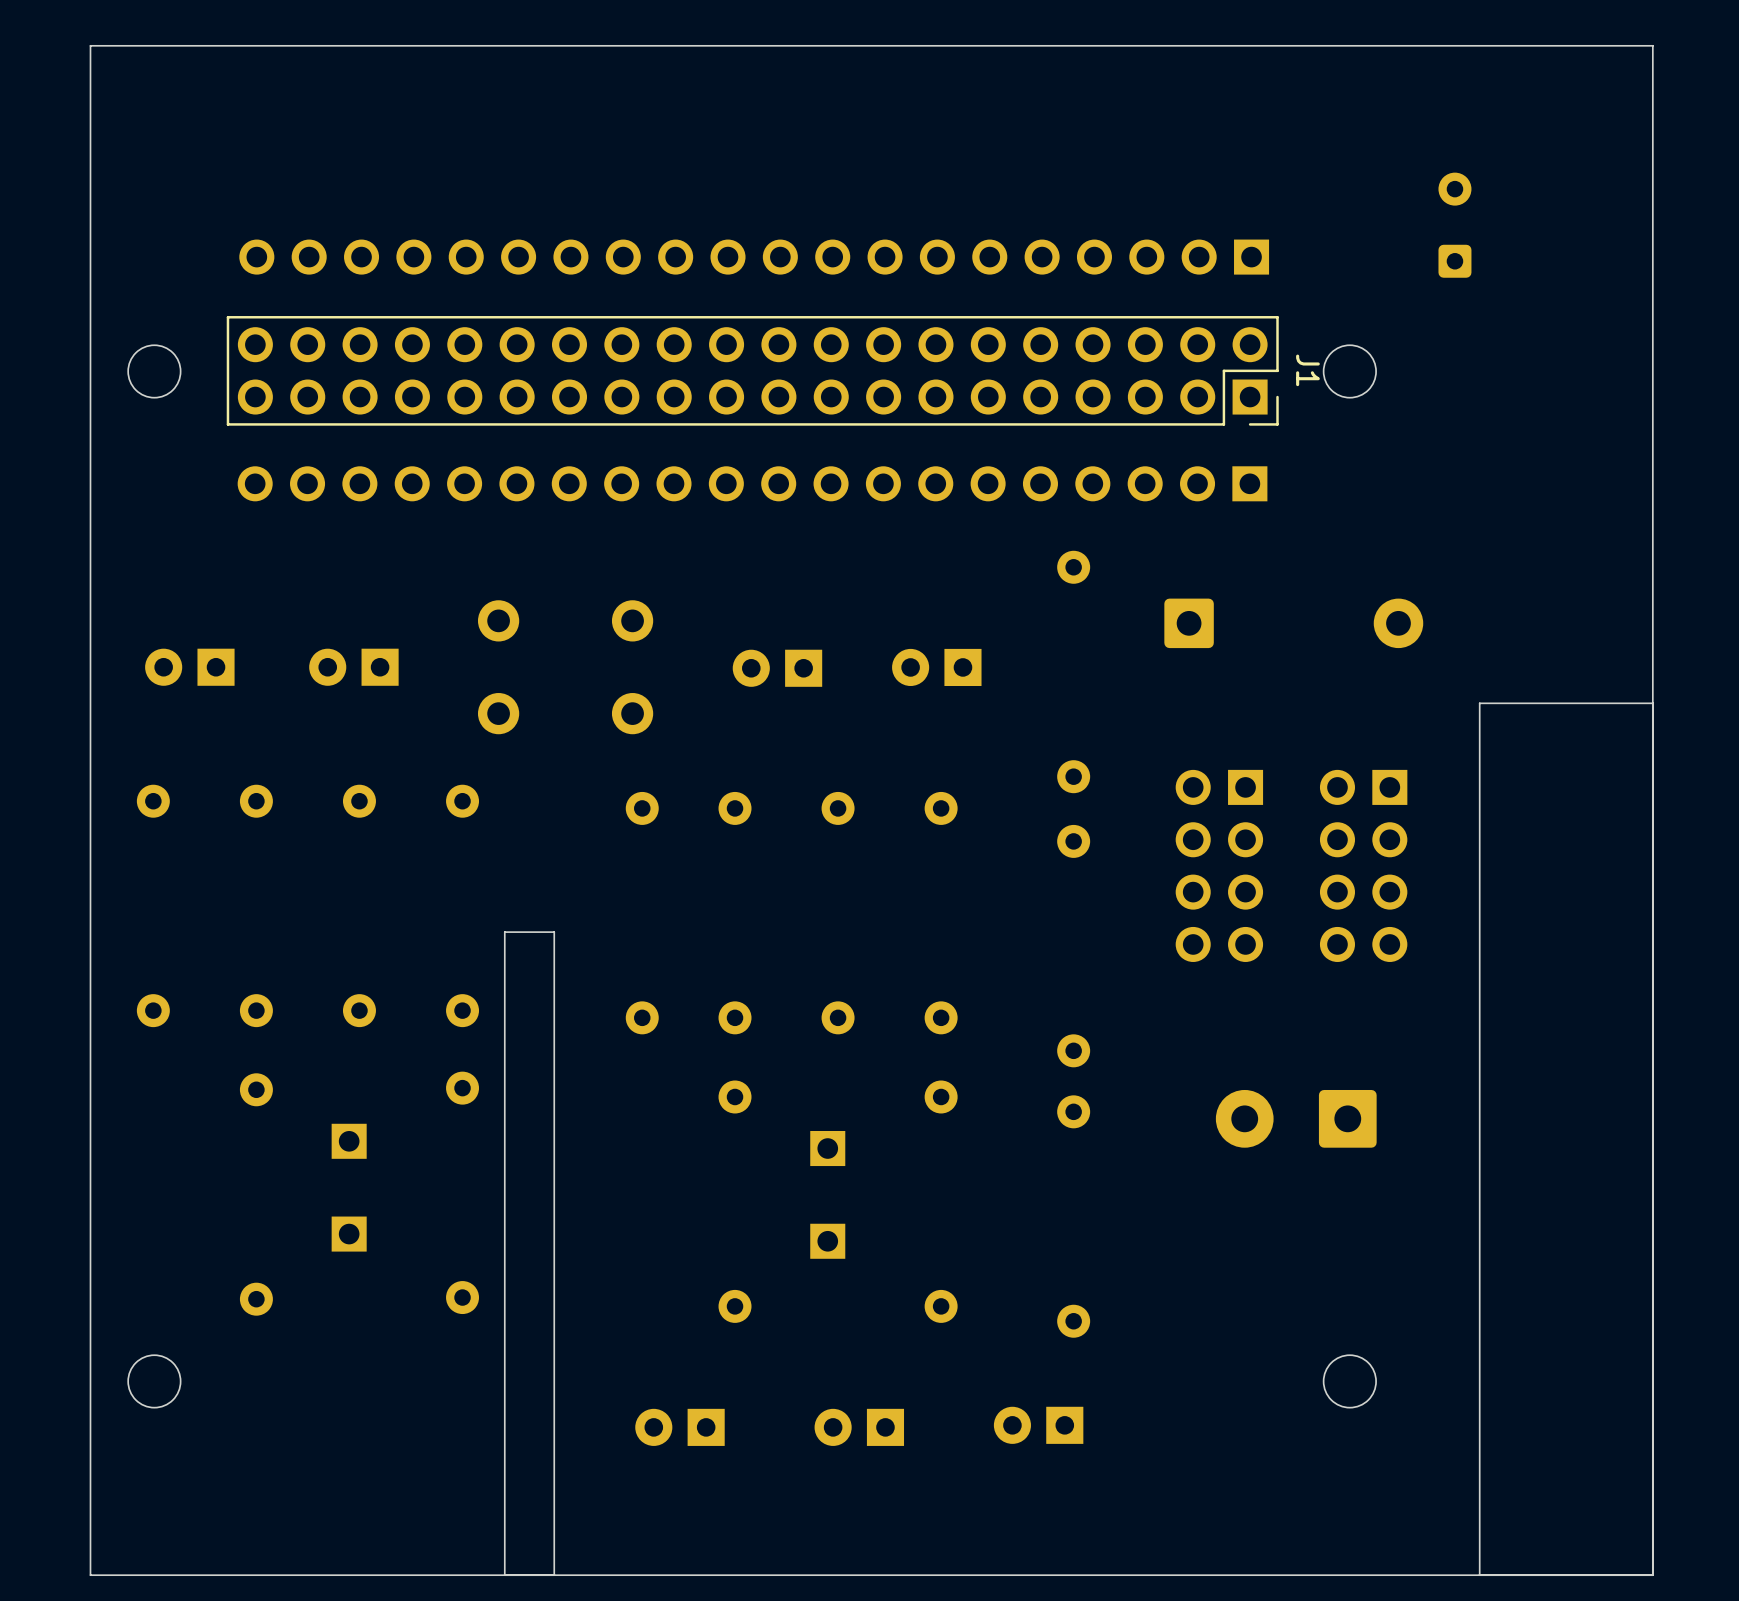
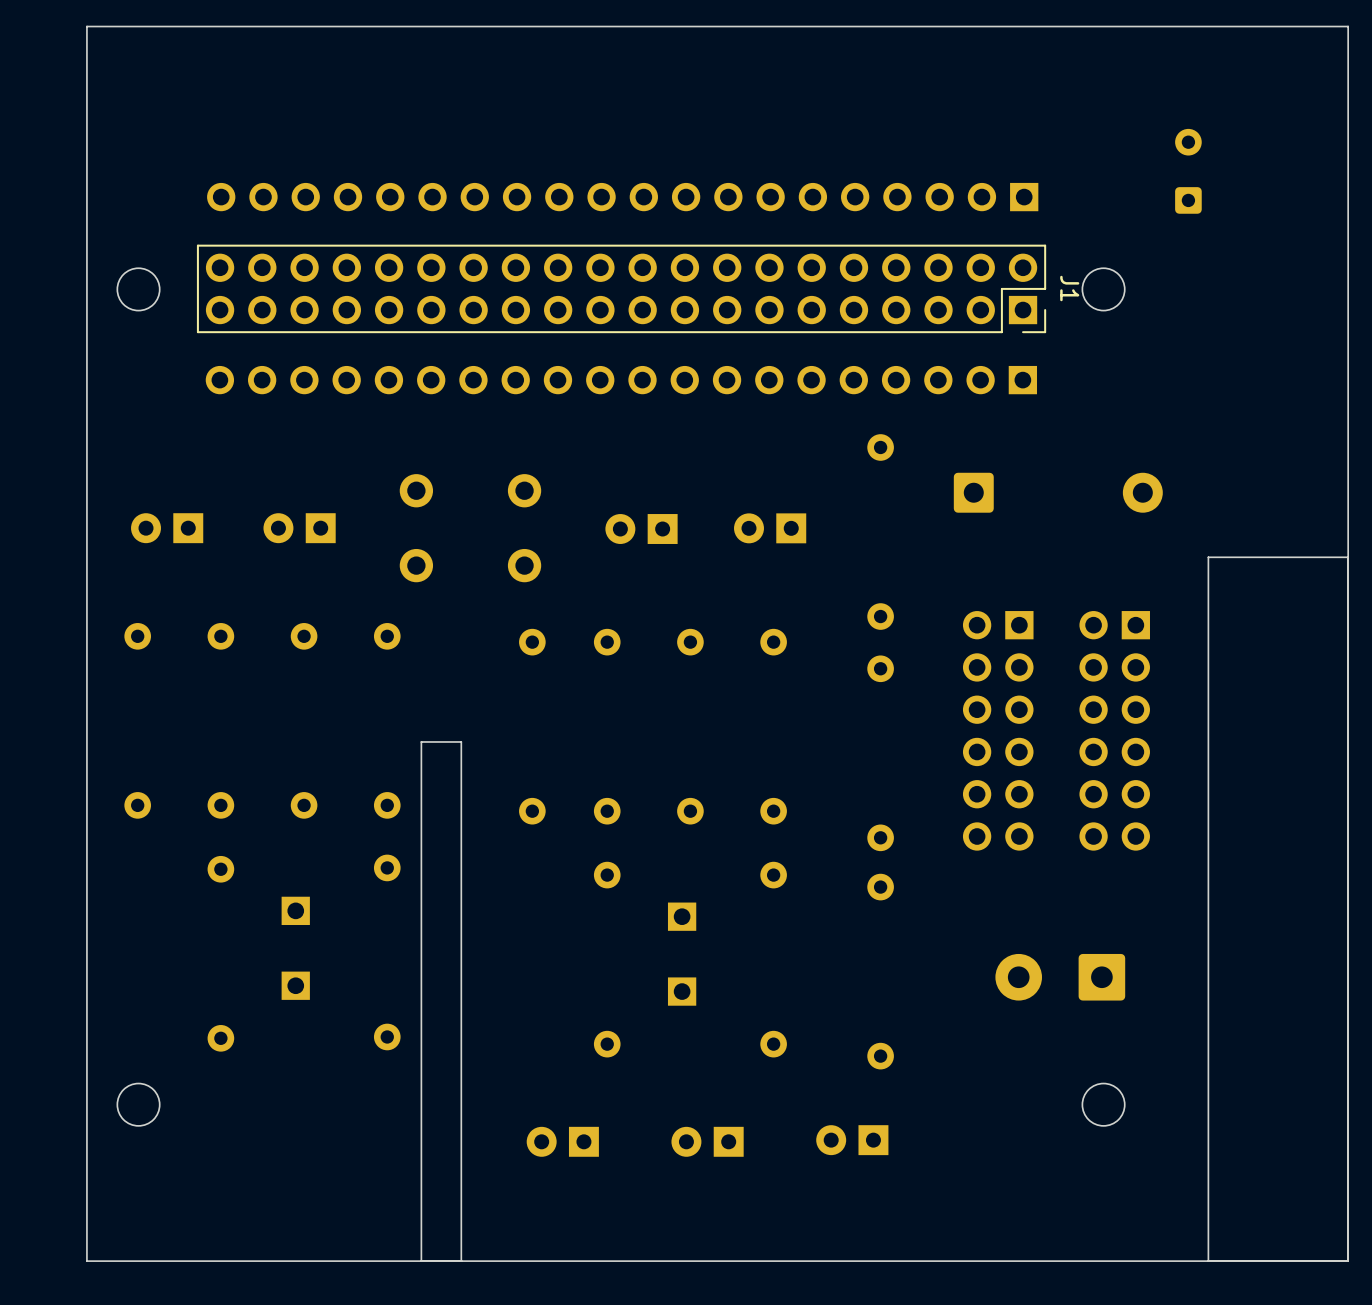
part: none -> (998, 730)
part: none -> (1114, 730)
part position: (1296, 1118) -> (1060, 977)

